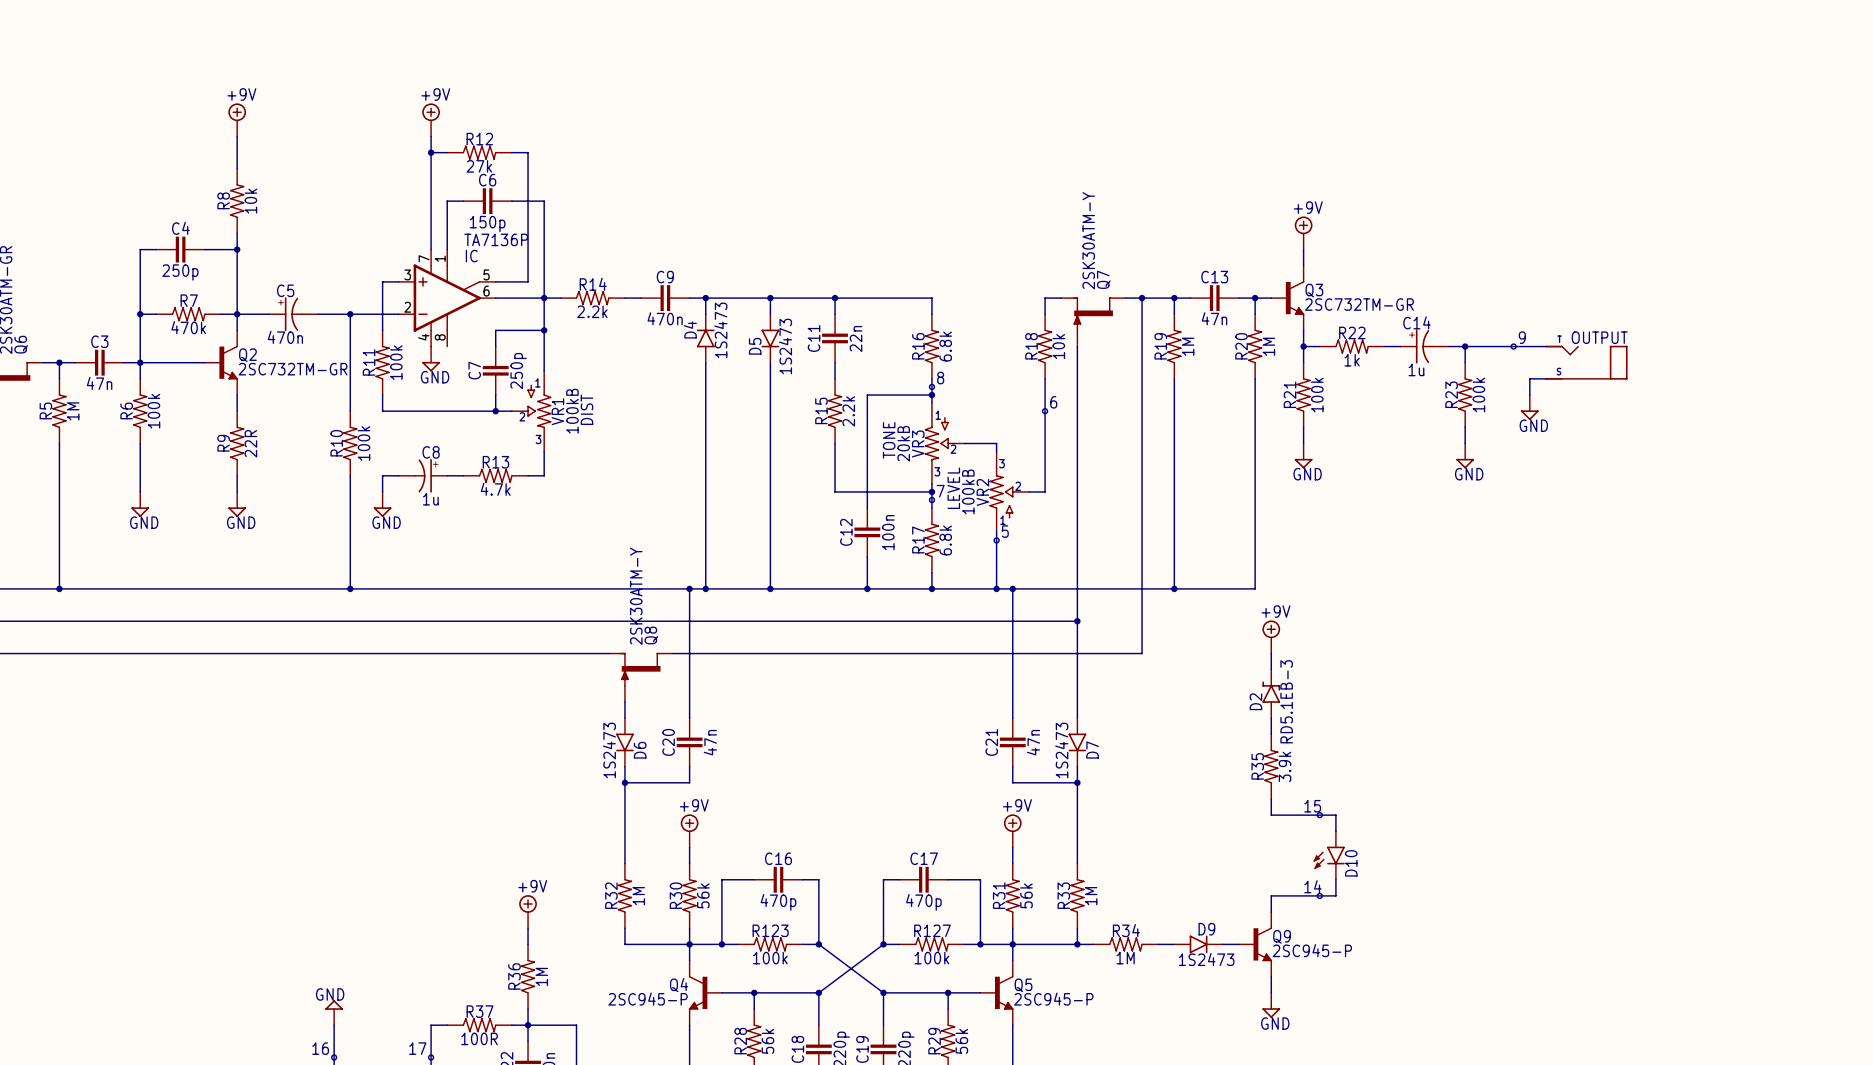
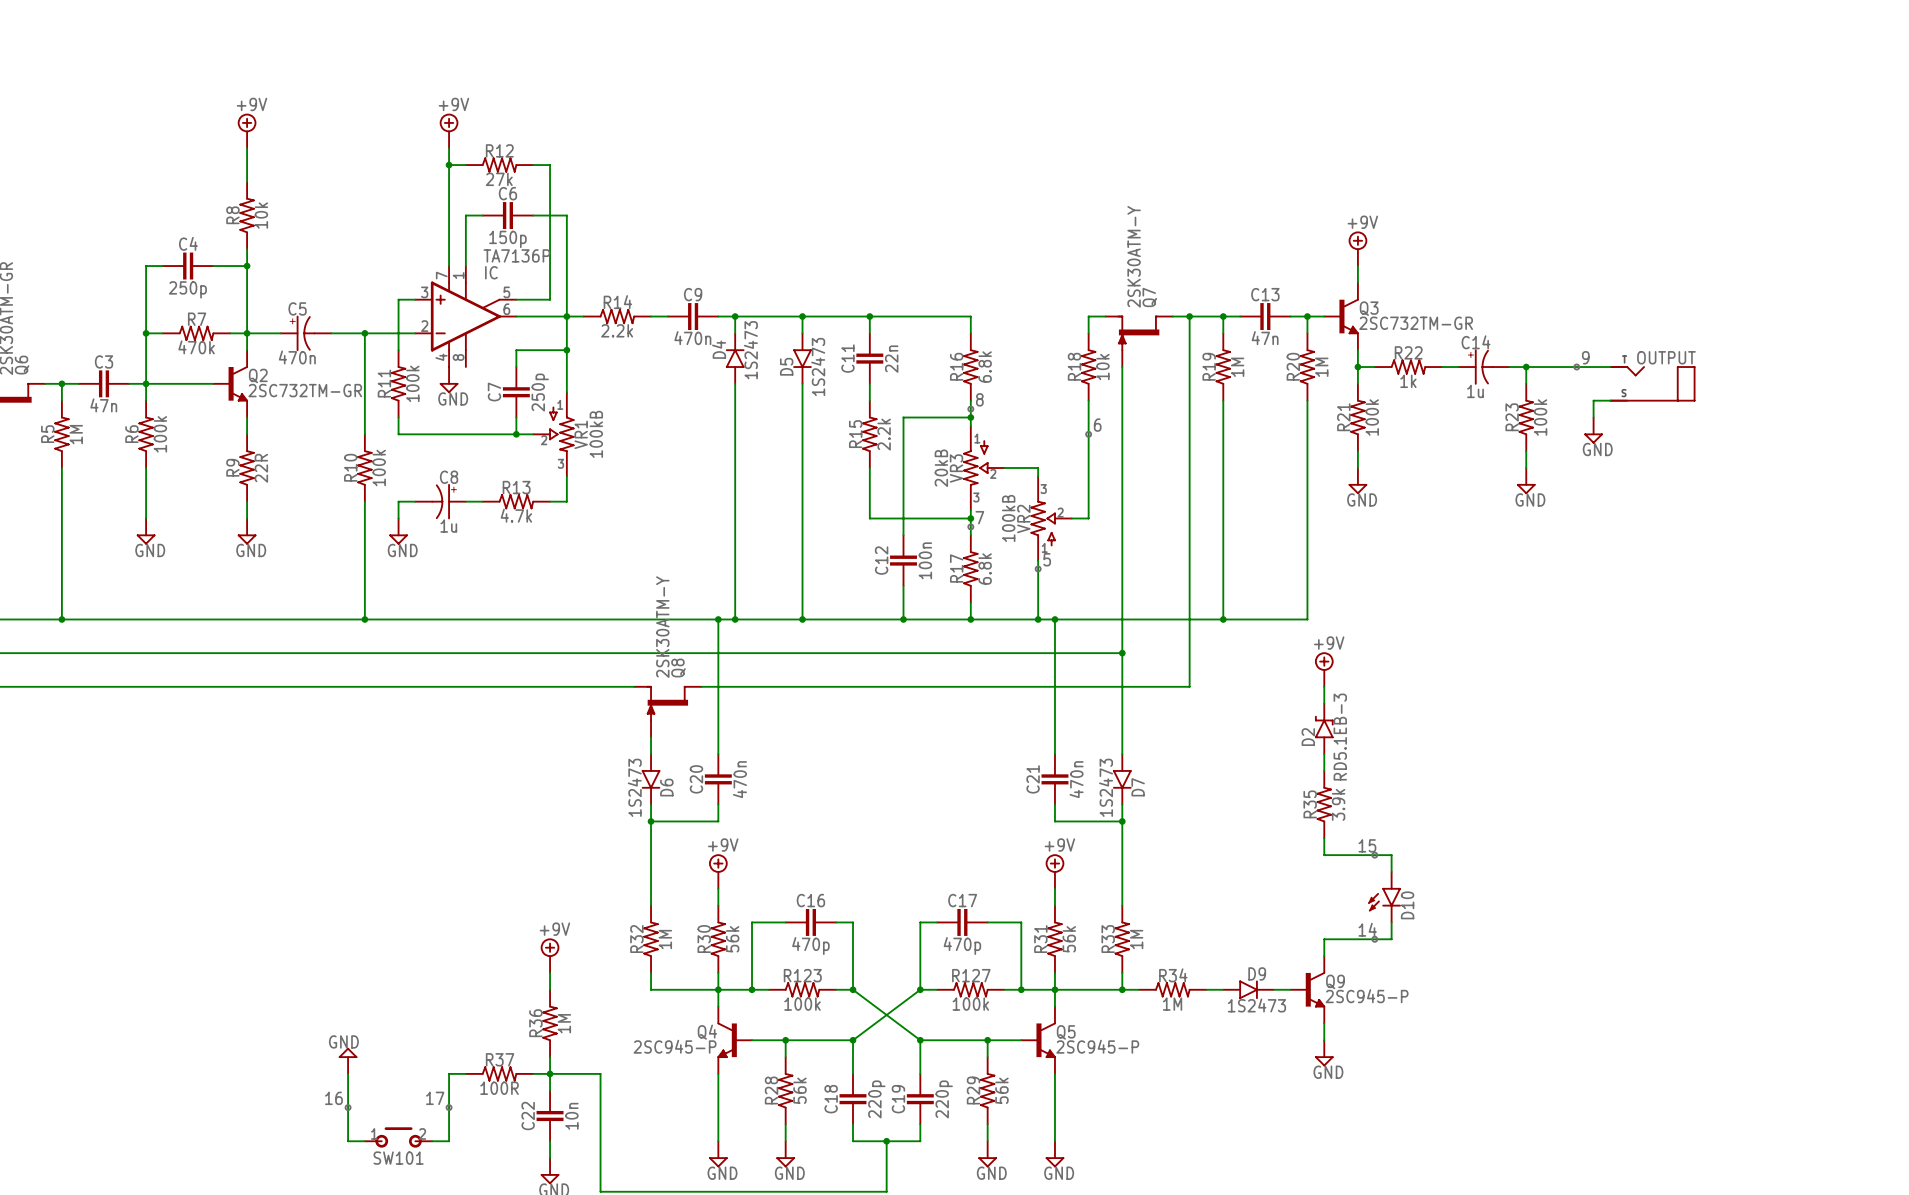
text: DIST (587, 409) -> none
text: TONE (889, 440) -> none
text: LEVEL (953, 488) -> none
C20 value: 47n (710, 742) -> 470n (739, 779)
C21 value: 47n (1033, 742) -> 470n (1076, 779)

